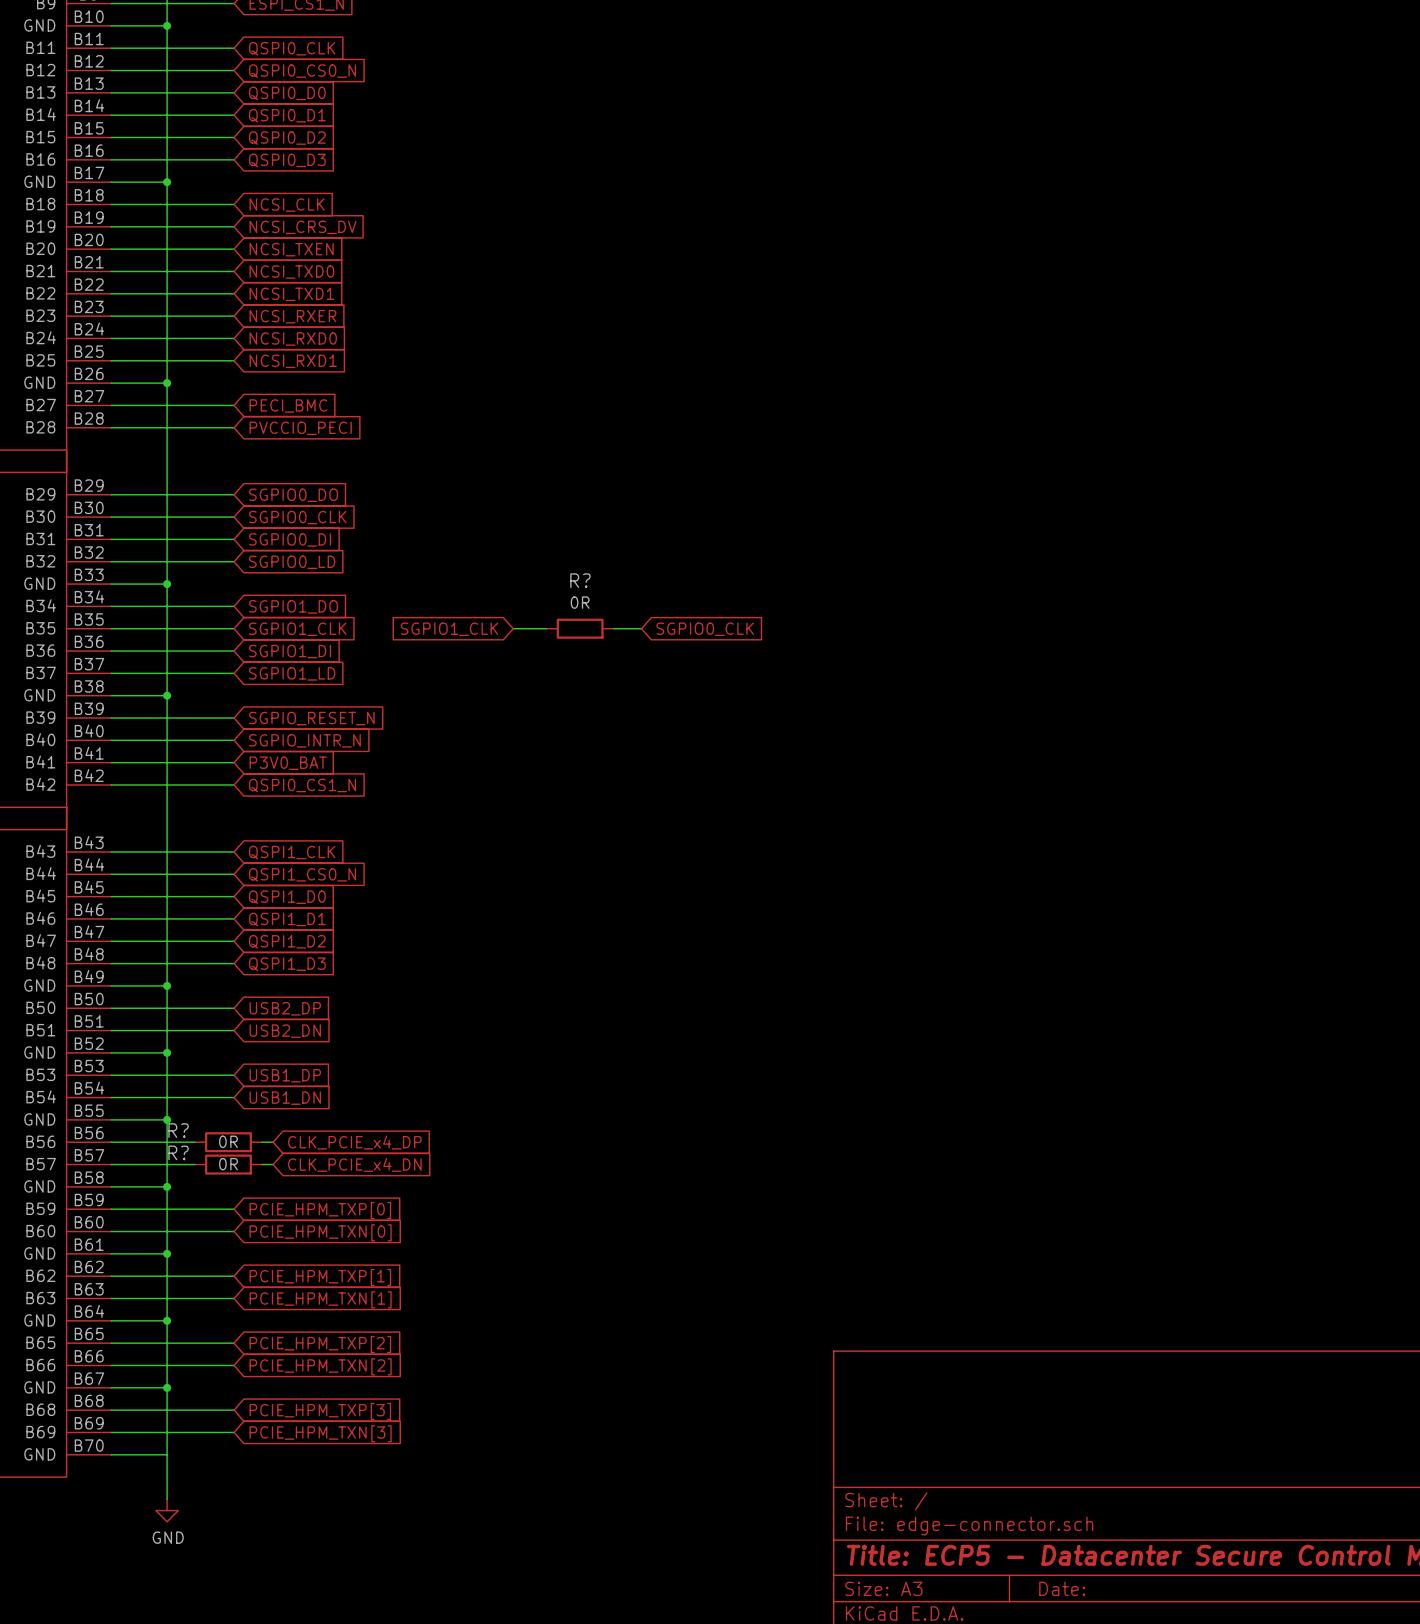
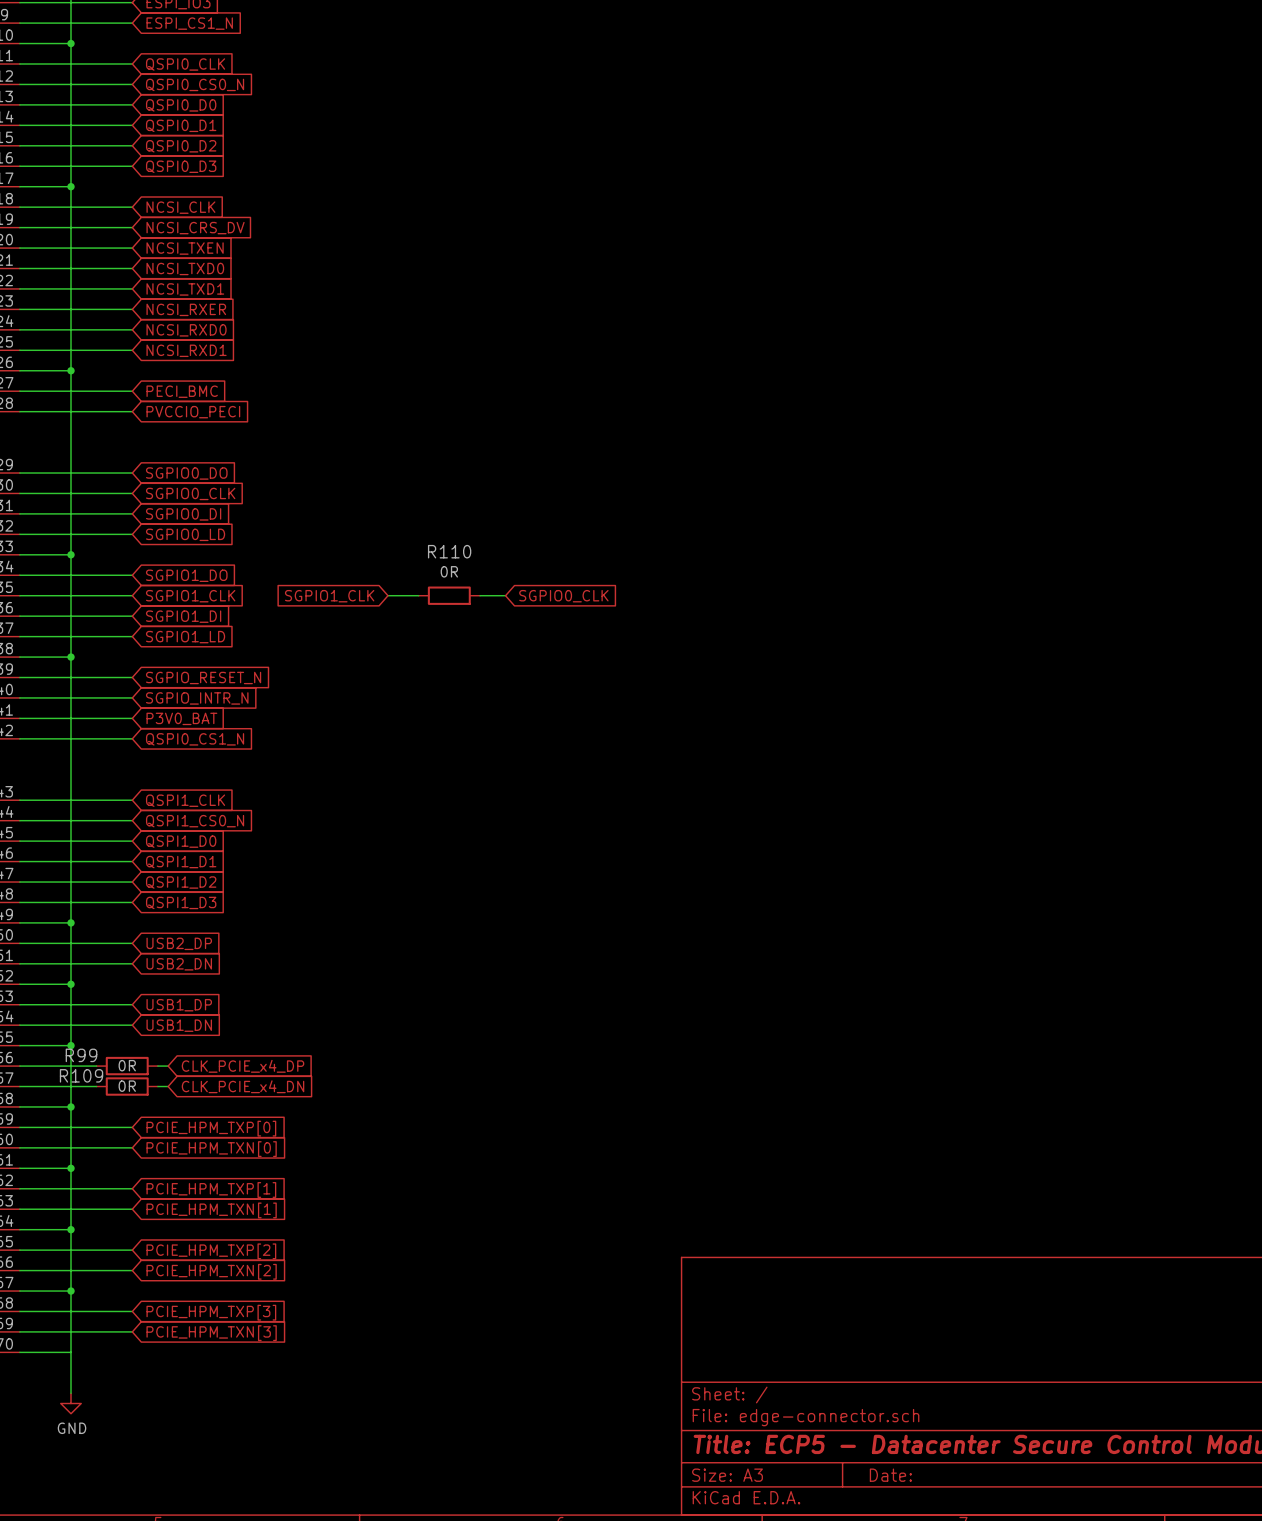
R? name: R? (580, 580) -> R110 (449, 551)
R? name: R? (178, 1130) -> R99 (81, 1055)
R? name: R? (178, 1152) -> R109 (81, 1075)

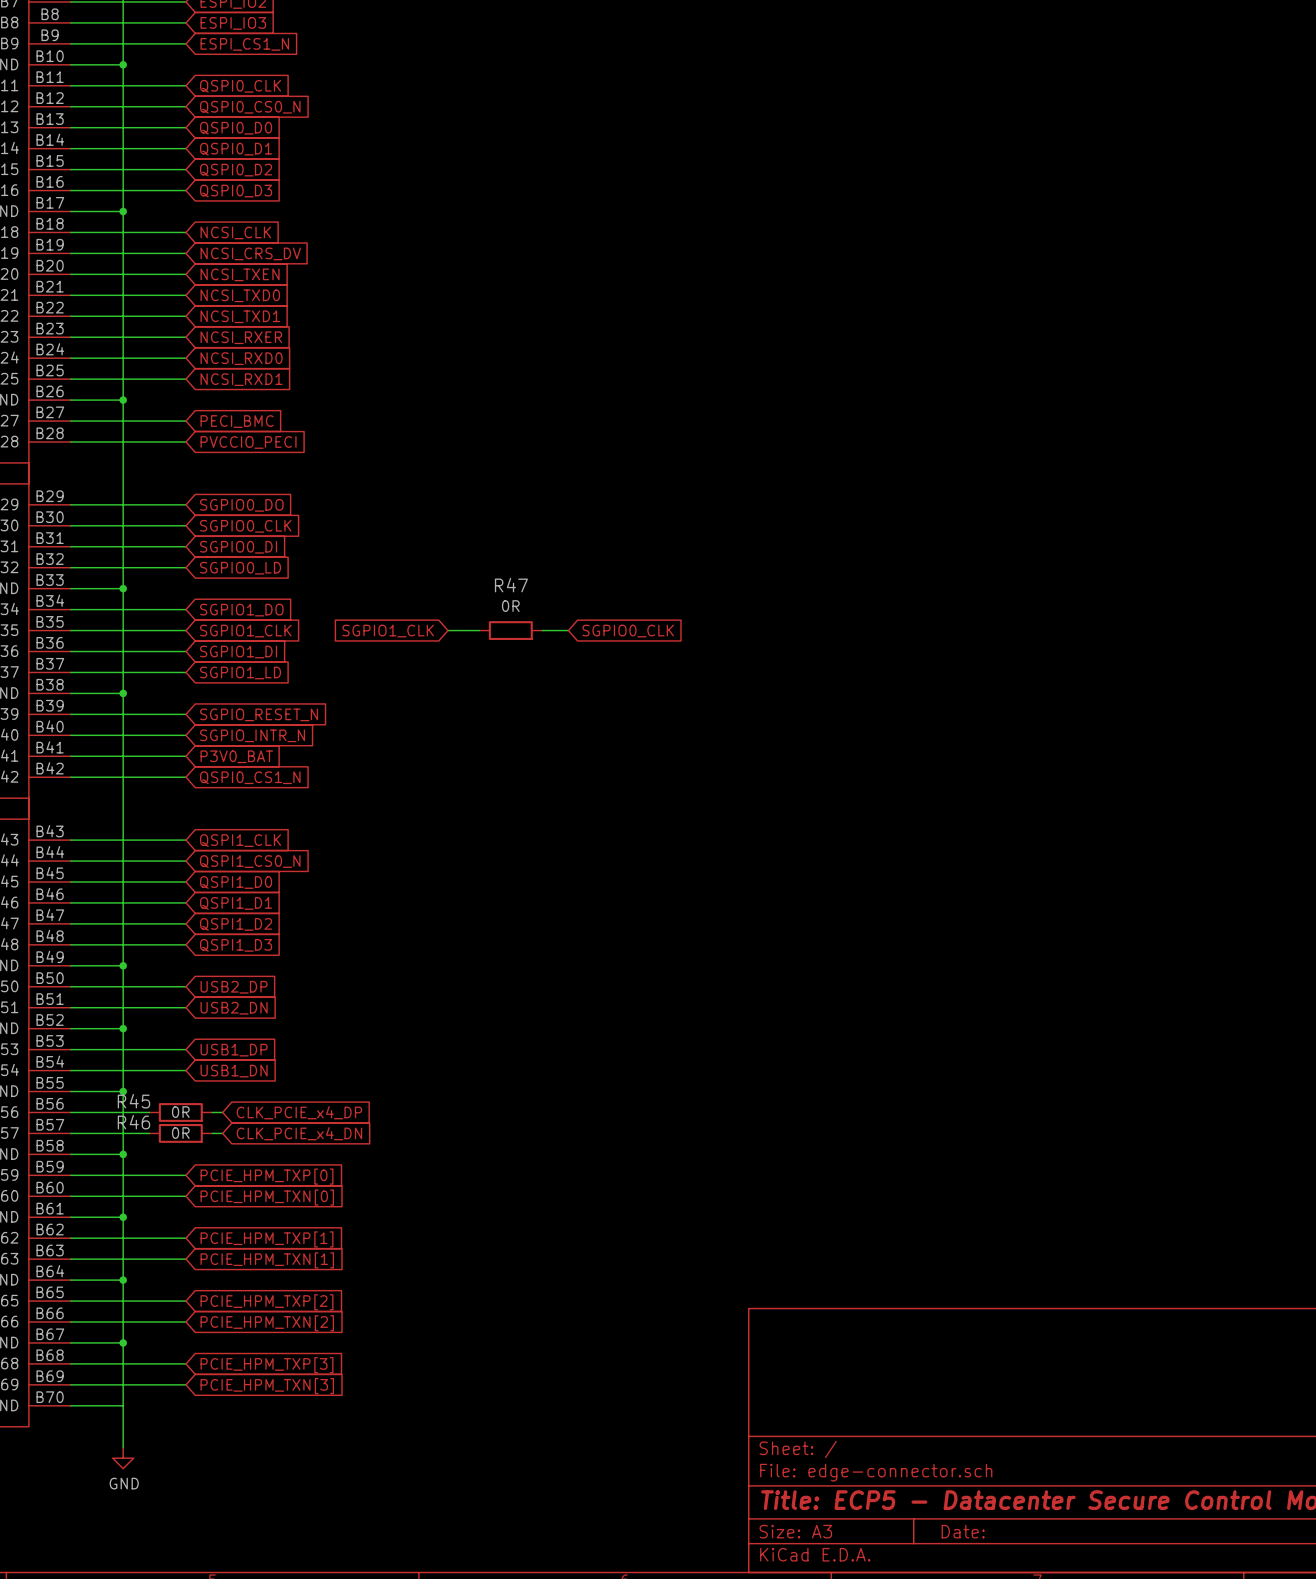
R110 name: R110 (449, 551) -> R47 (511, 585)
R99 name: R99 (81, 1055) -> R45 (133, 1101)
R109 name: R109 (81, 1075) -> R46 (133, 1122)

